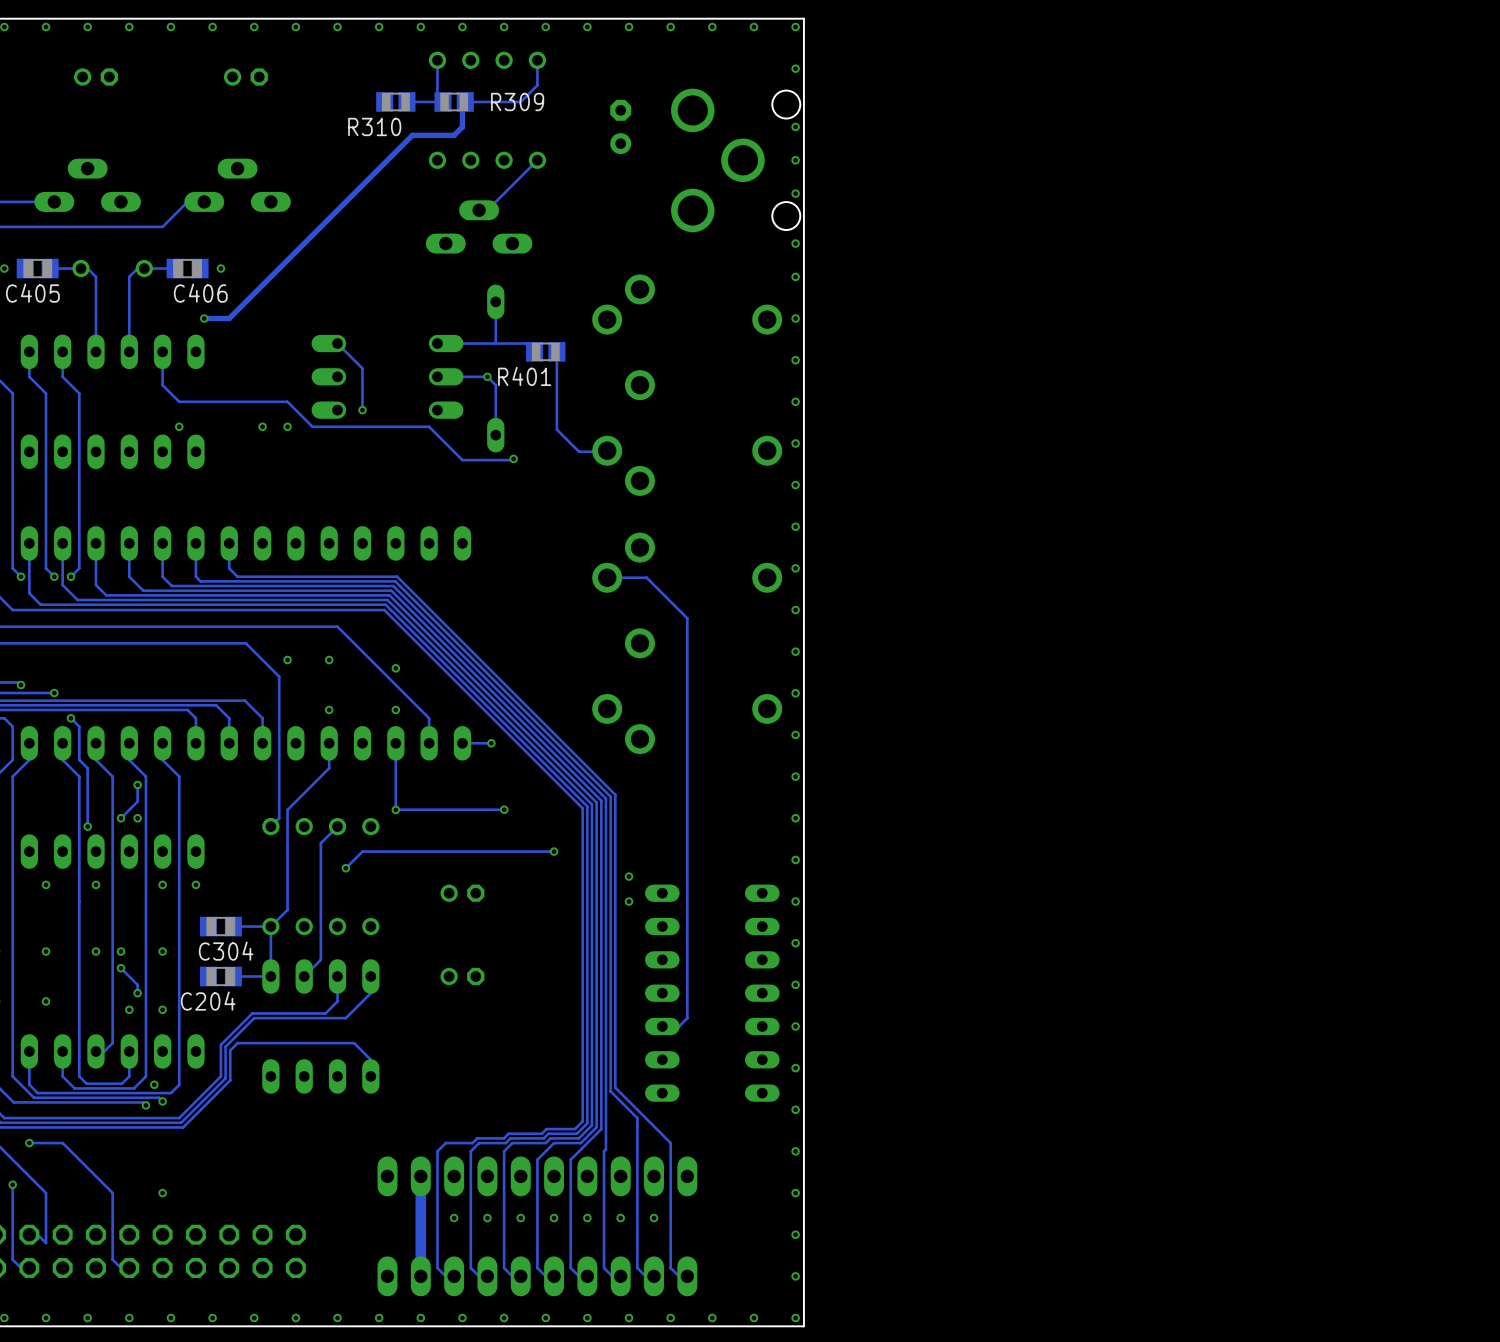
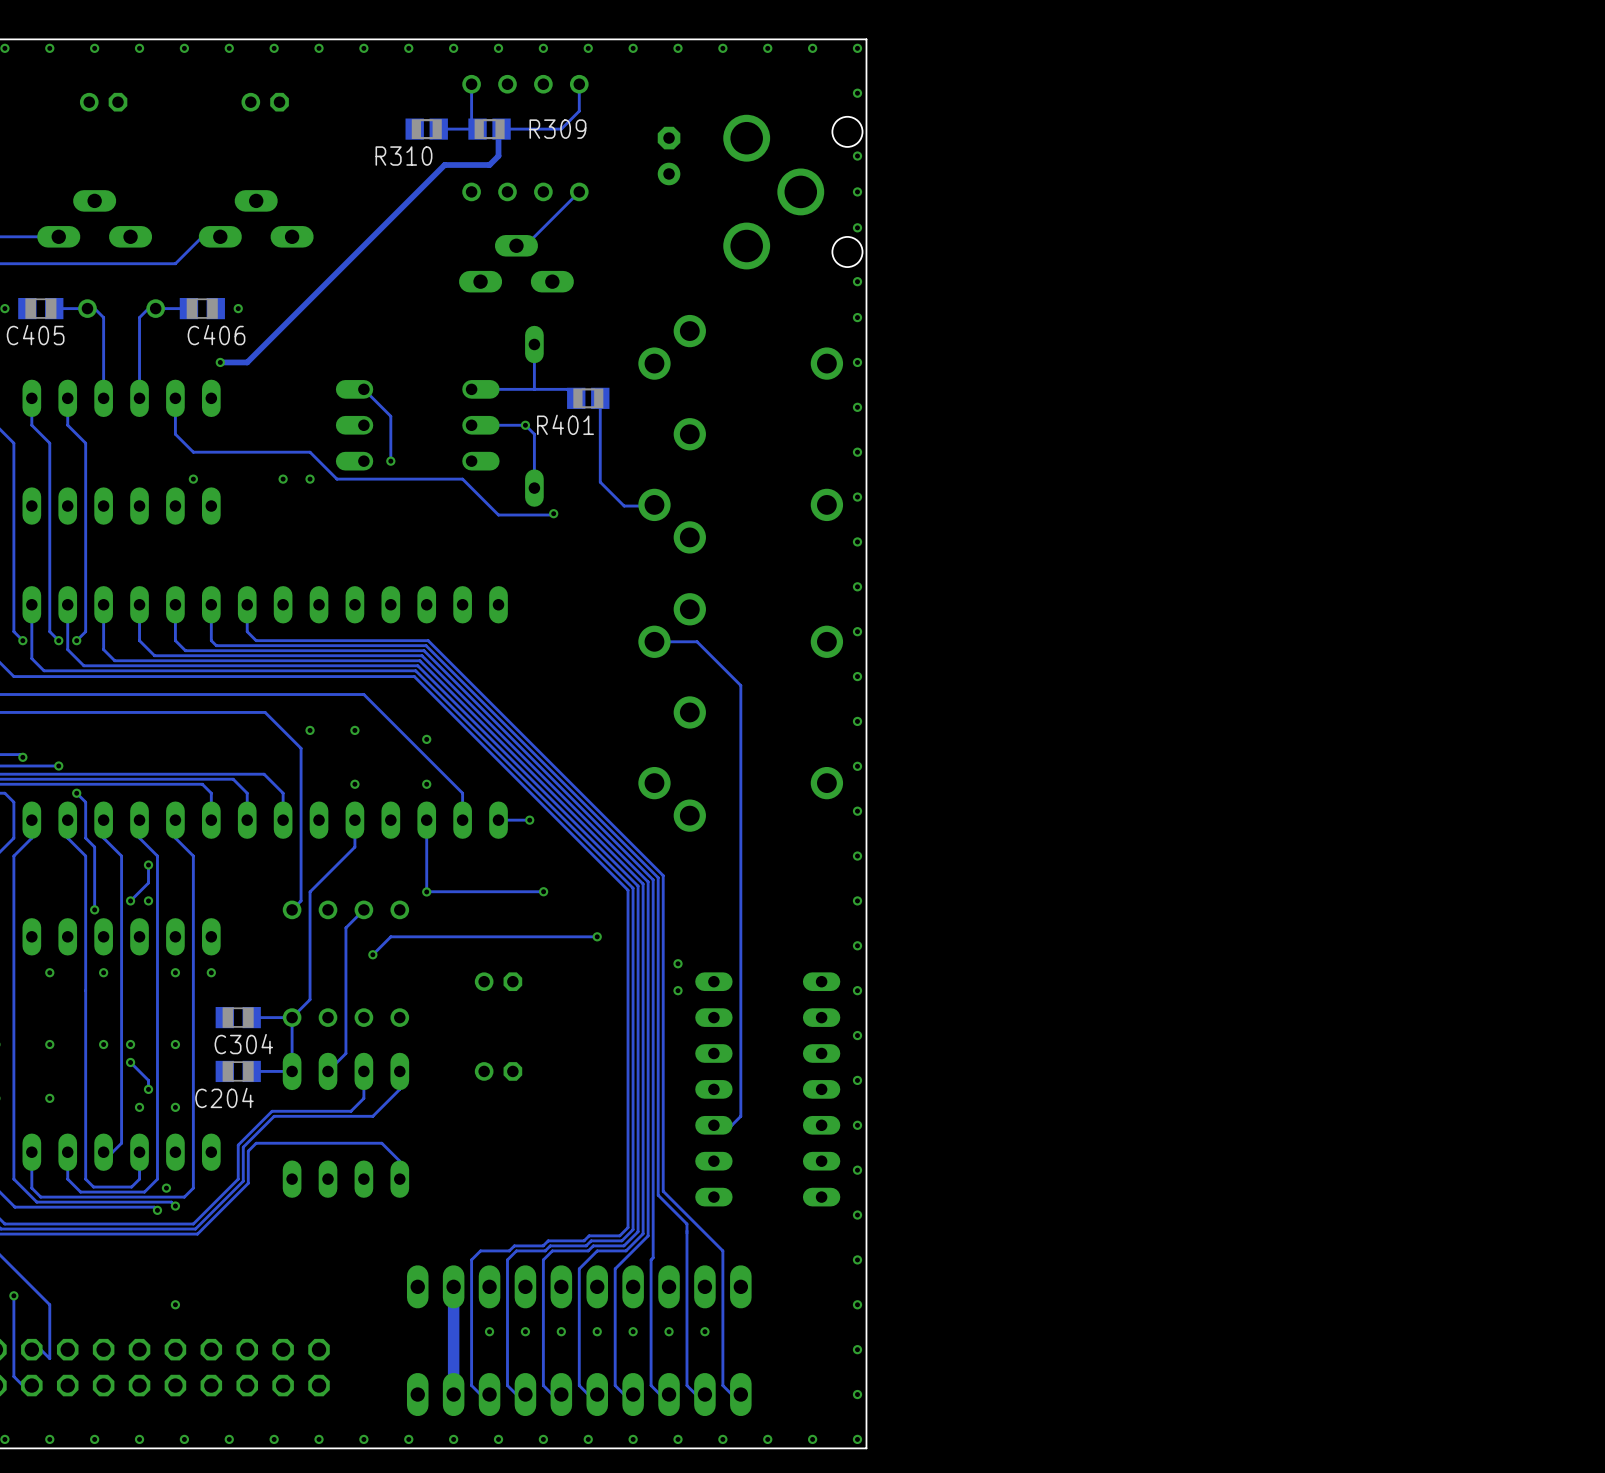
track: (29, 1143) (62, 1143) (112, 1193) (112, 1259) (120, 1268) (129, 1268) -> none
via: (29, 1143) -> none

